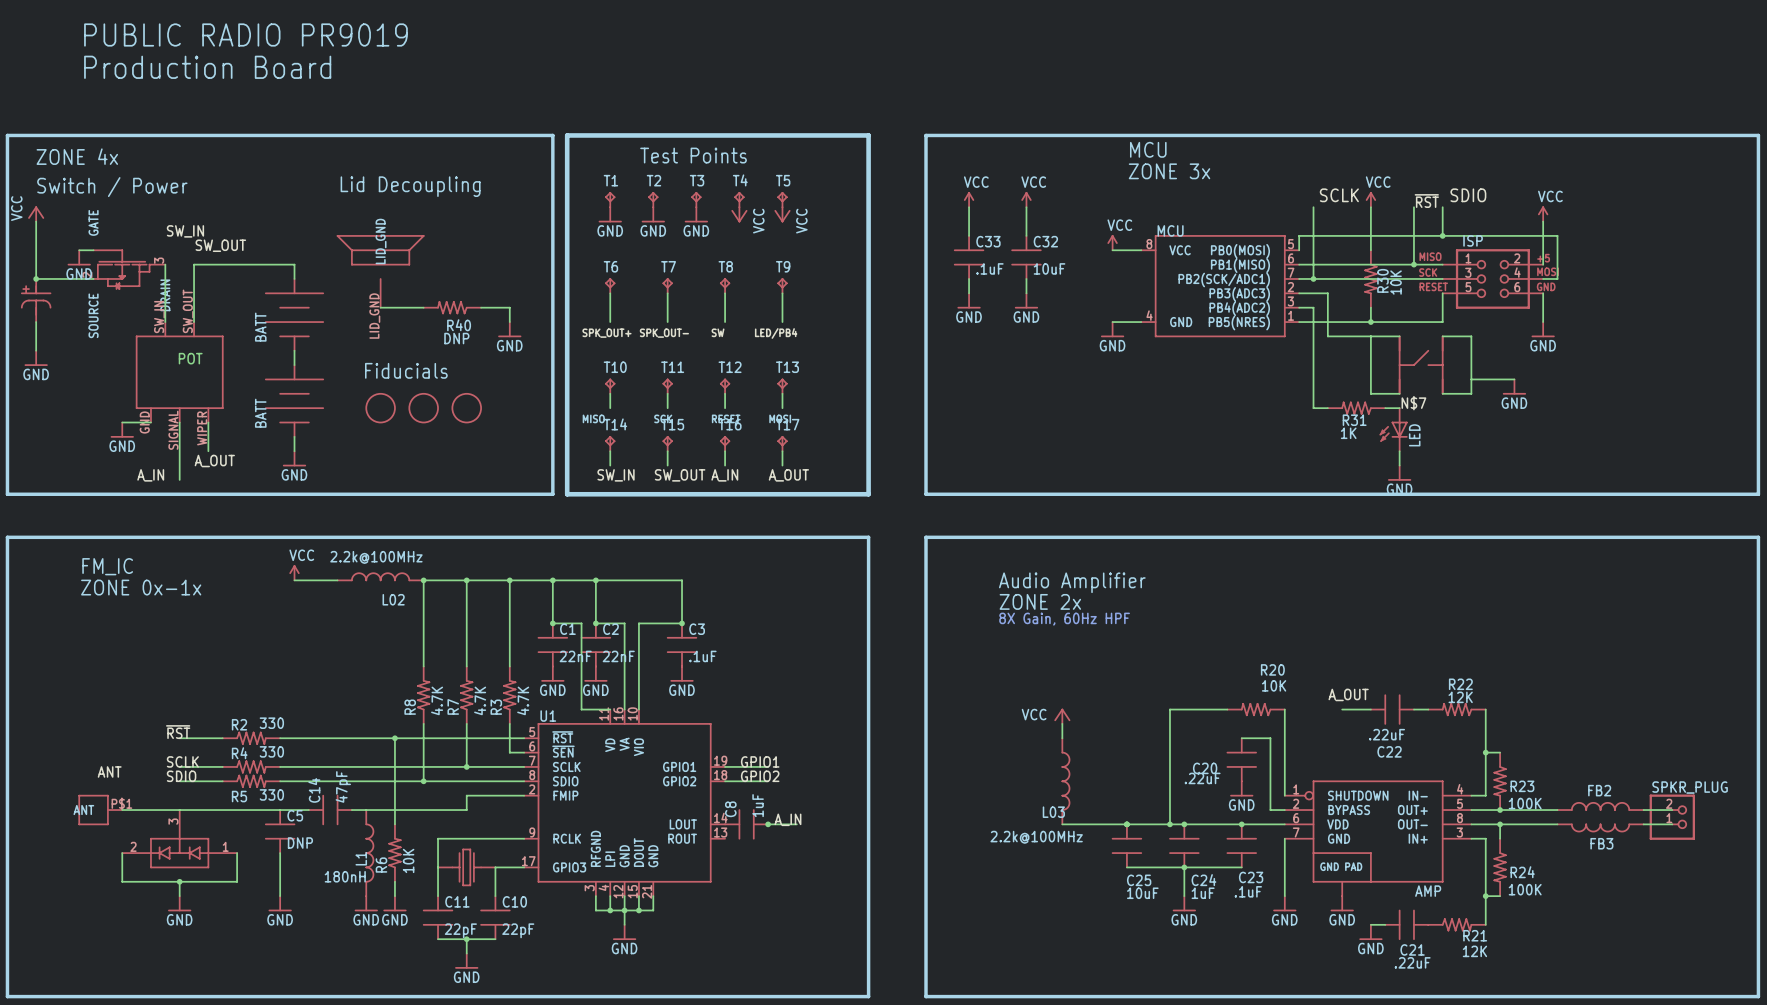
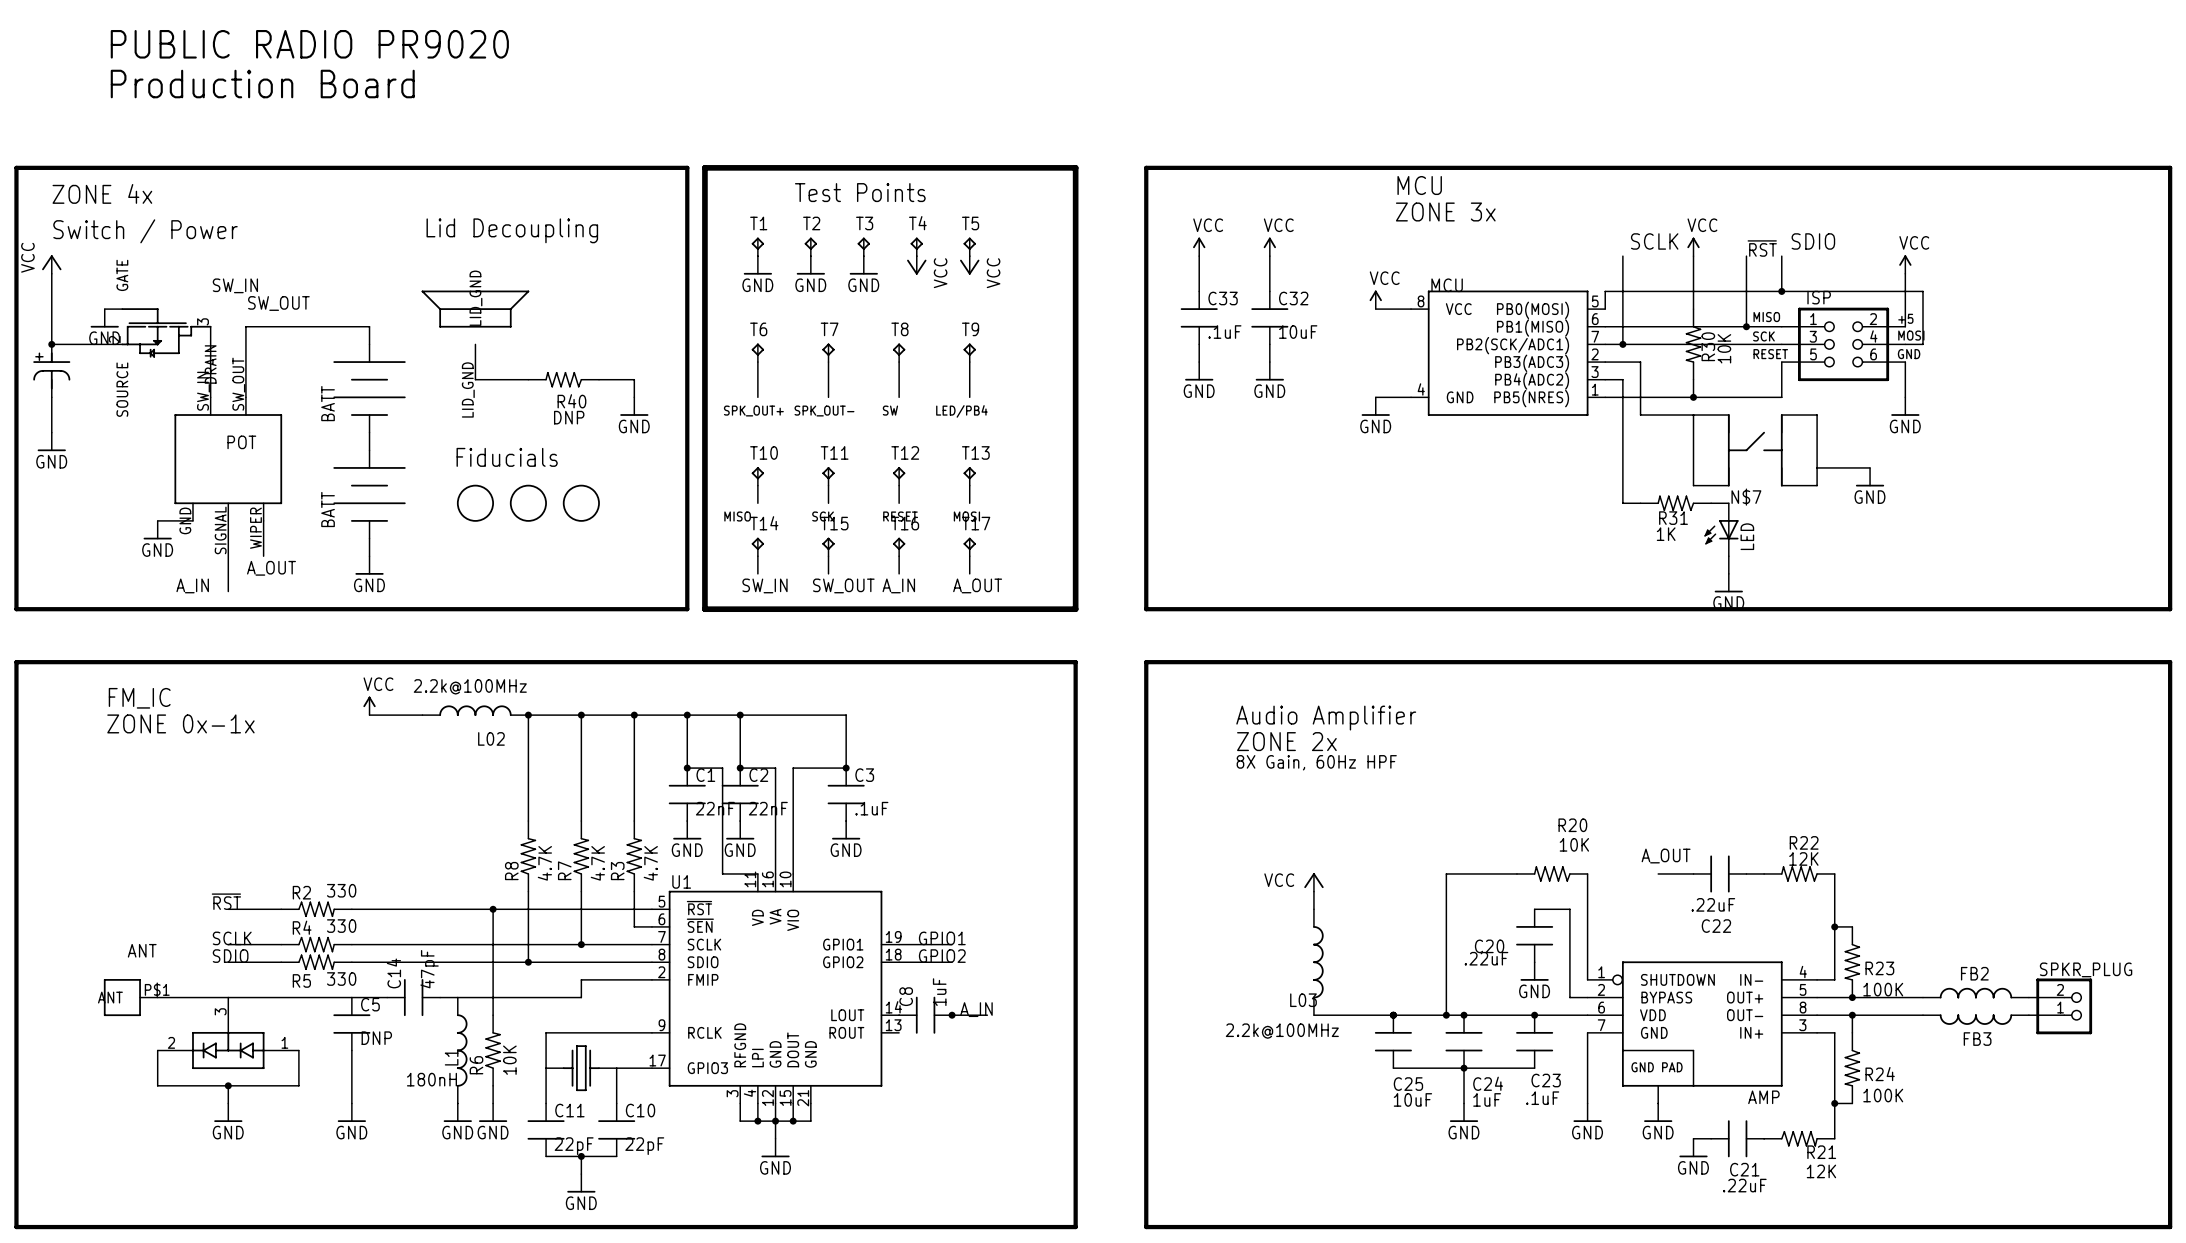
text: PUBLIC RADIO PR9019 (245, 34) -> PUBLIC RADIO PR9020 (309, 44)

